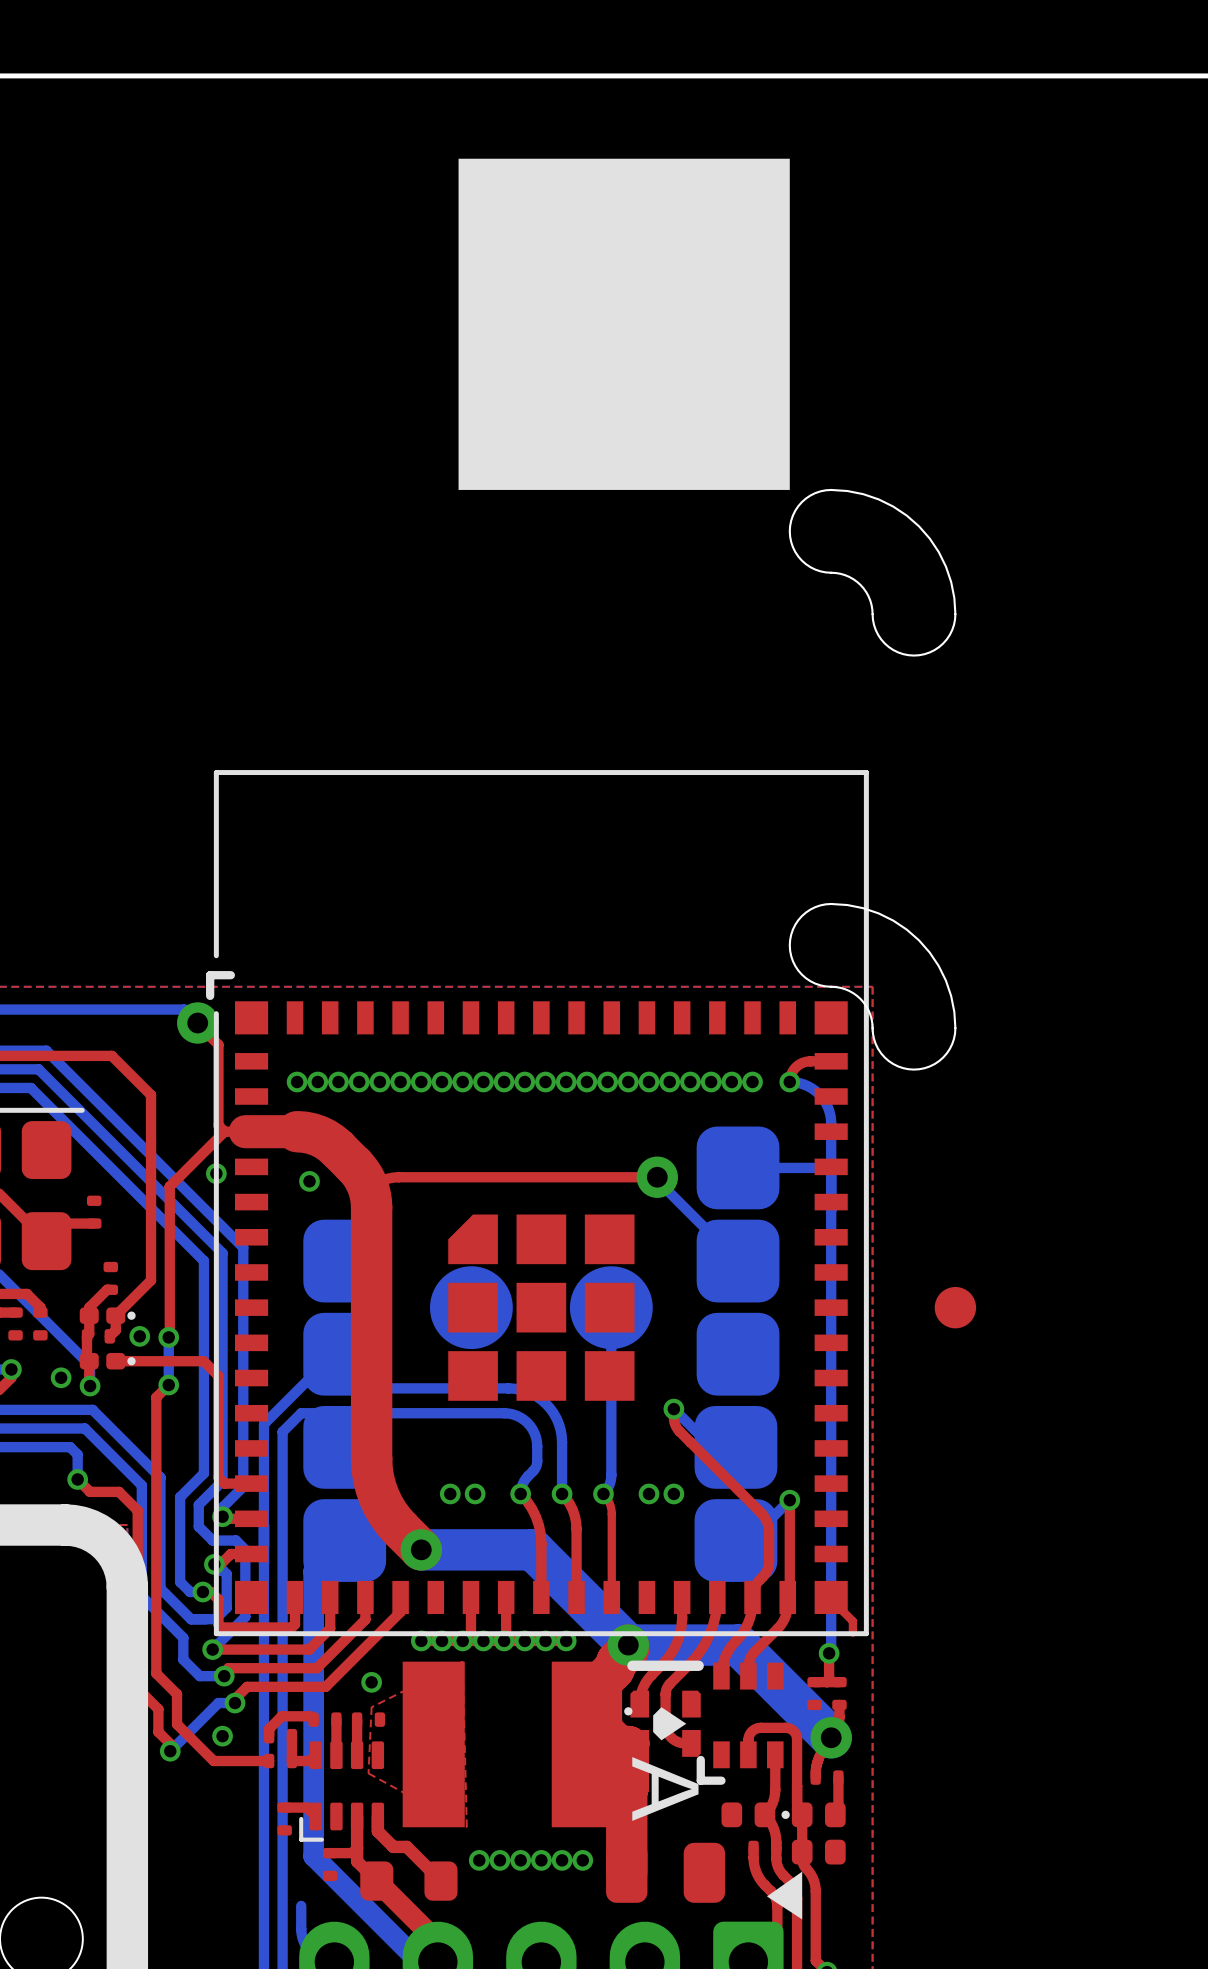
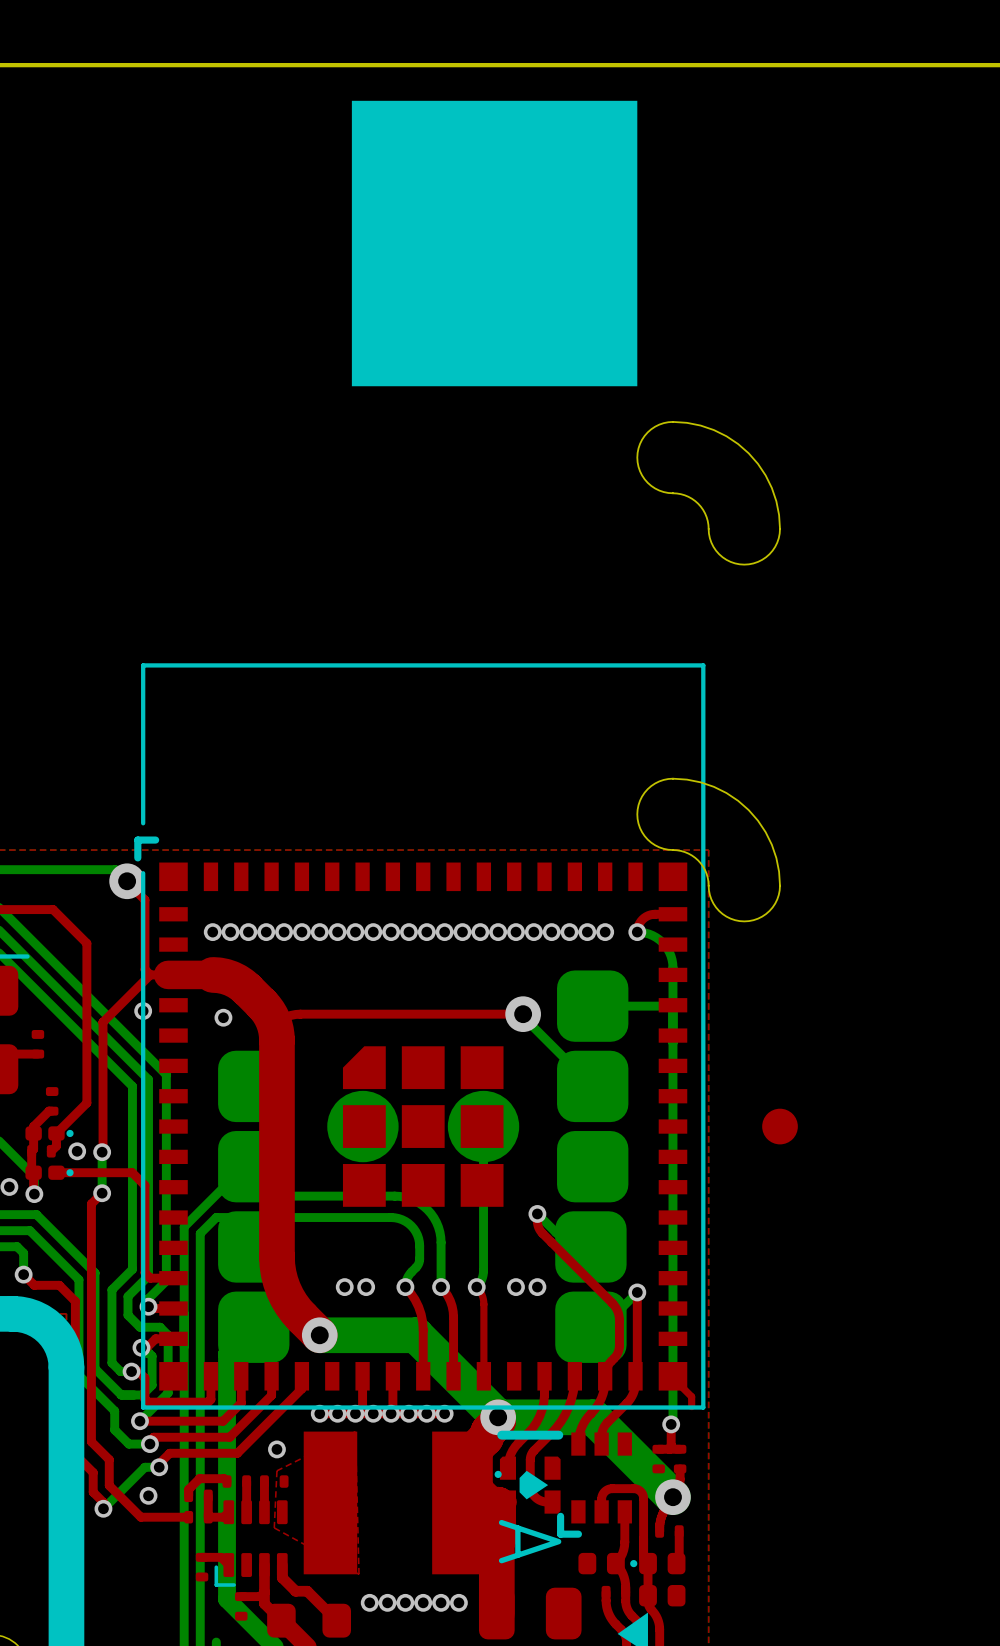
drawing position: (624, 324) -> (494, 243)

